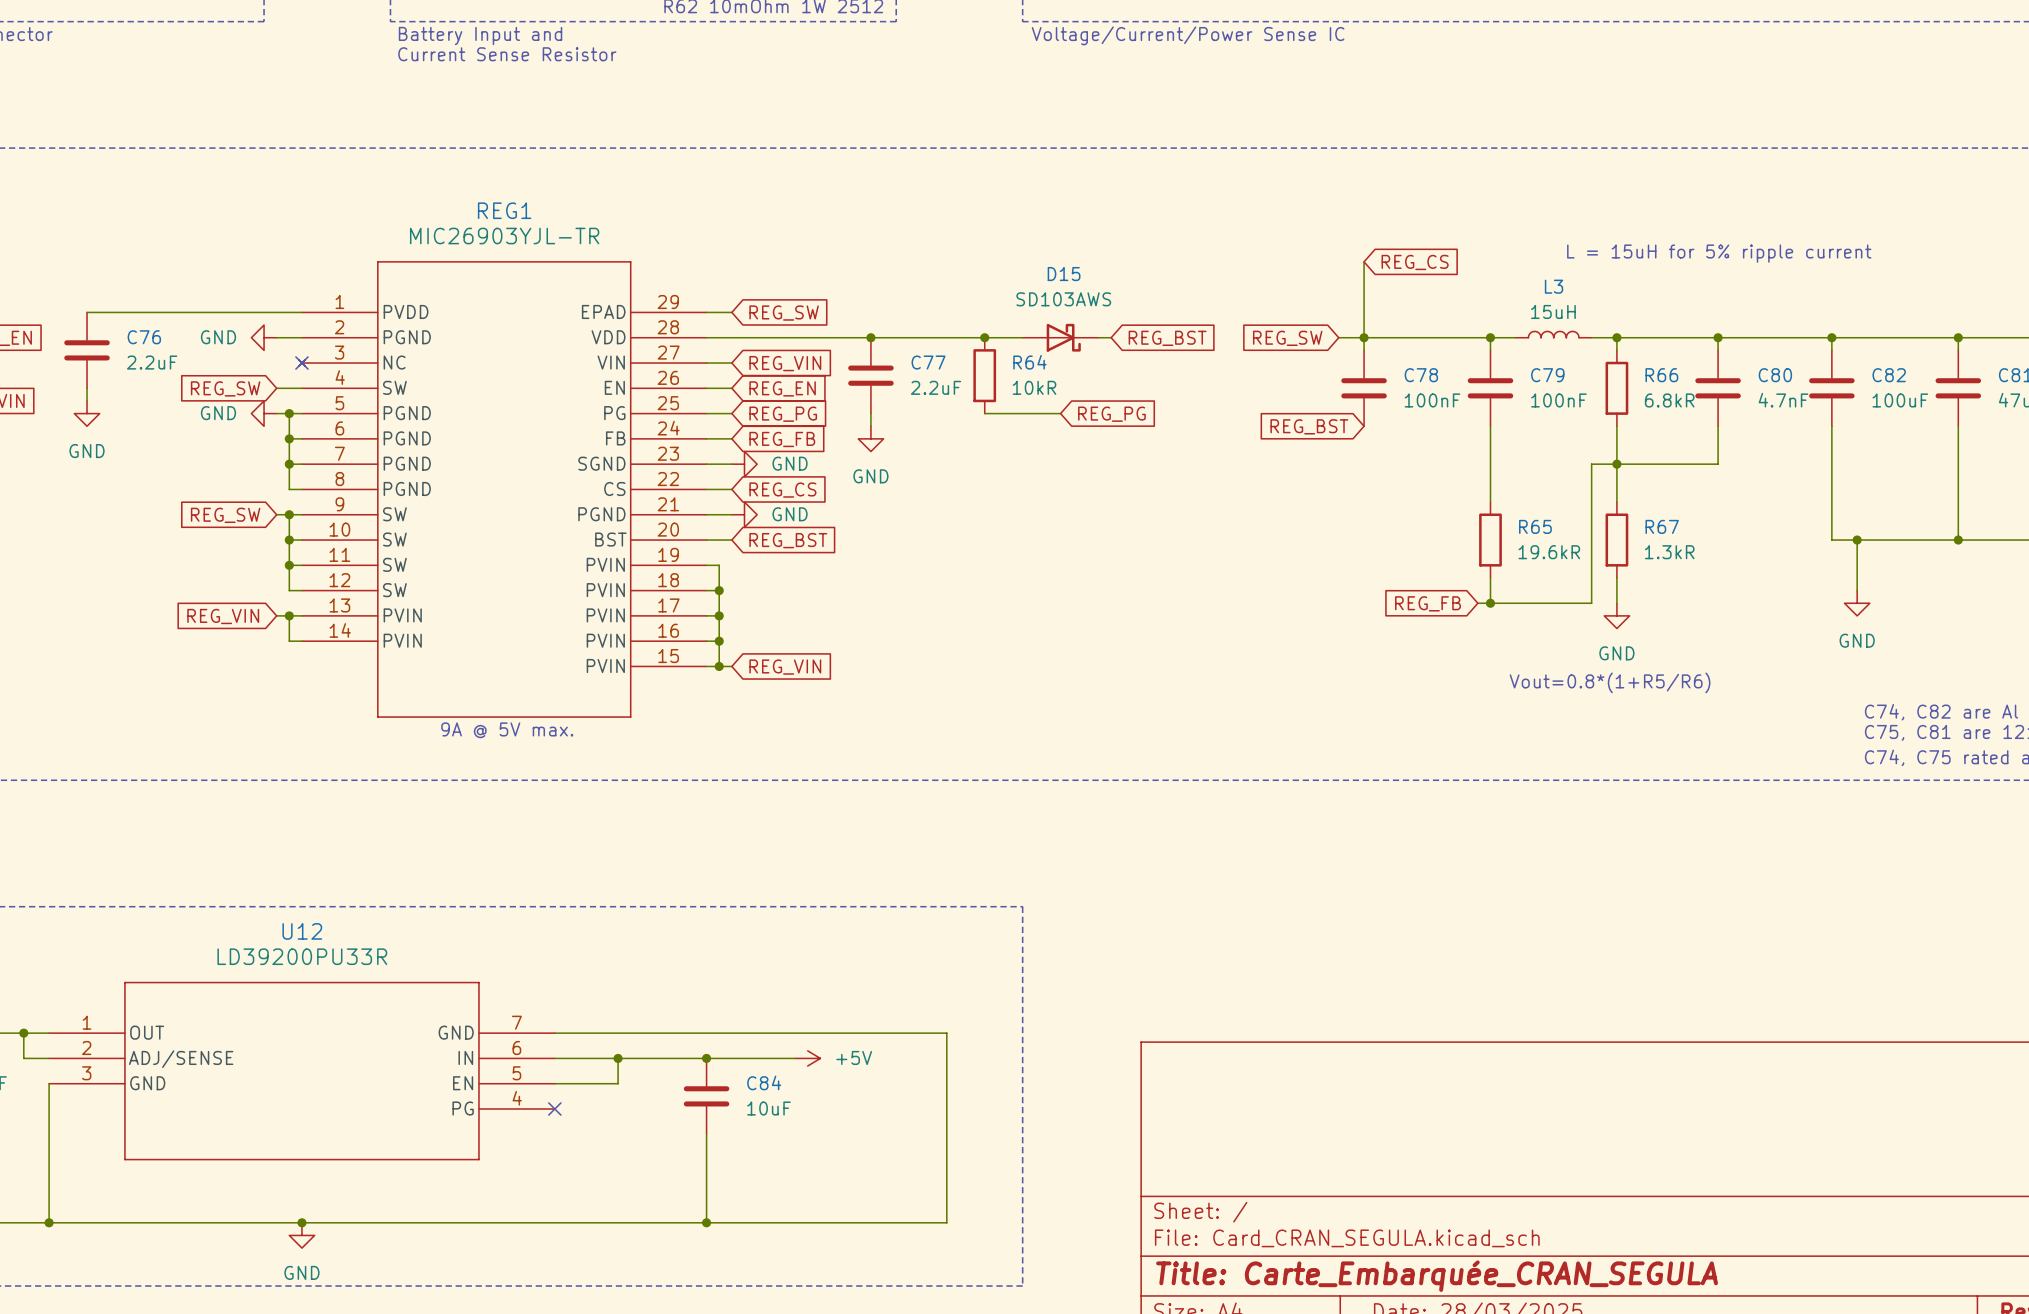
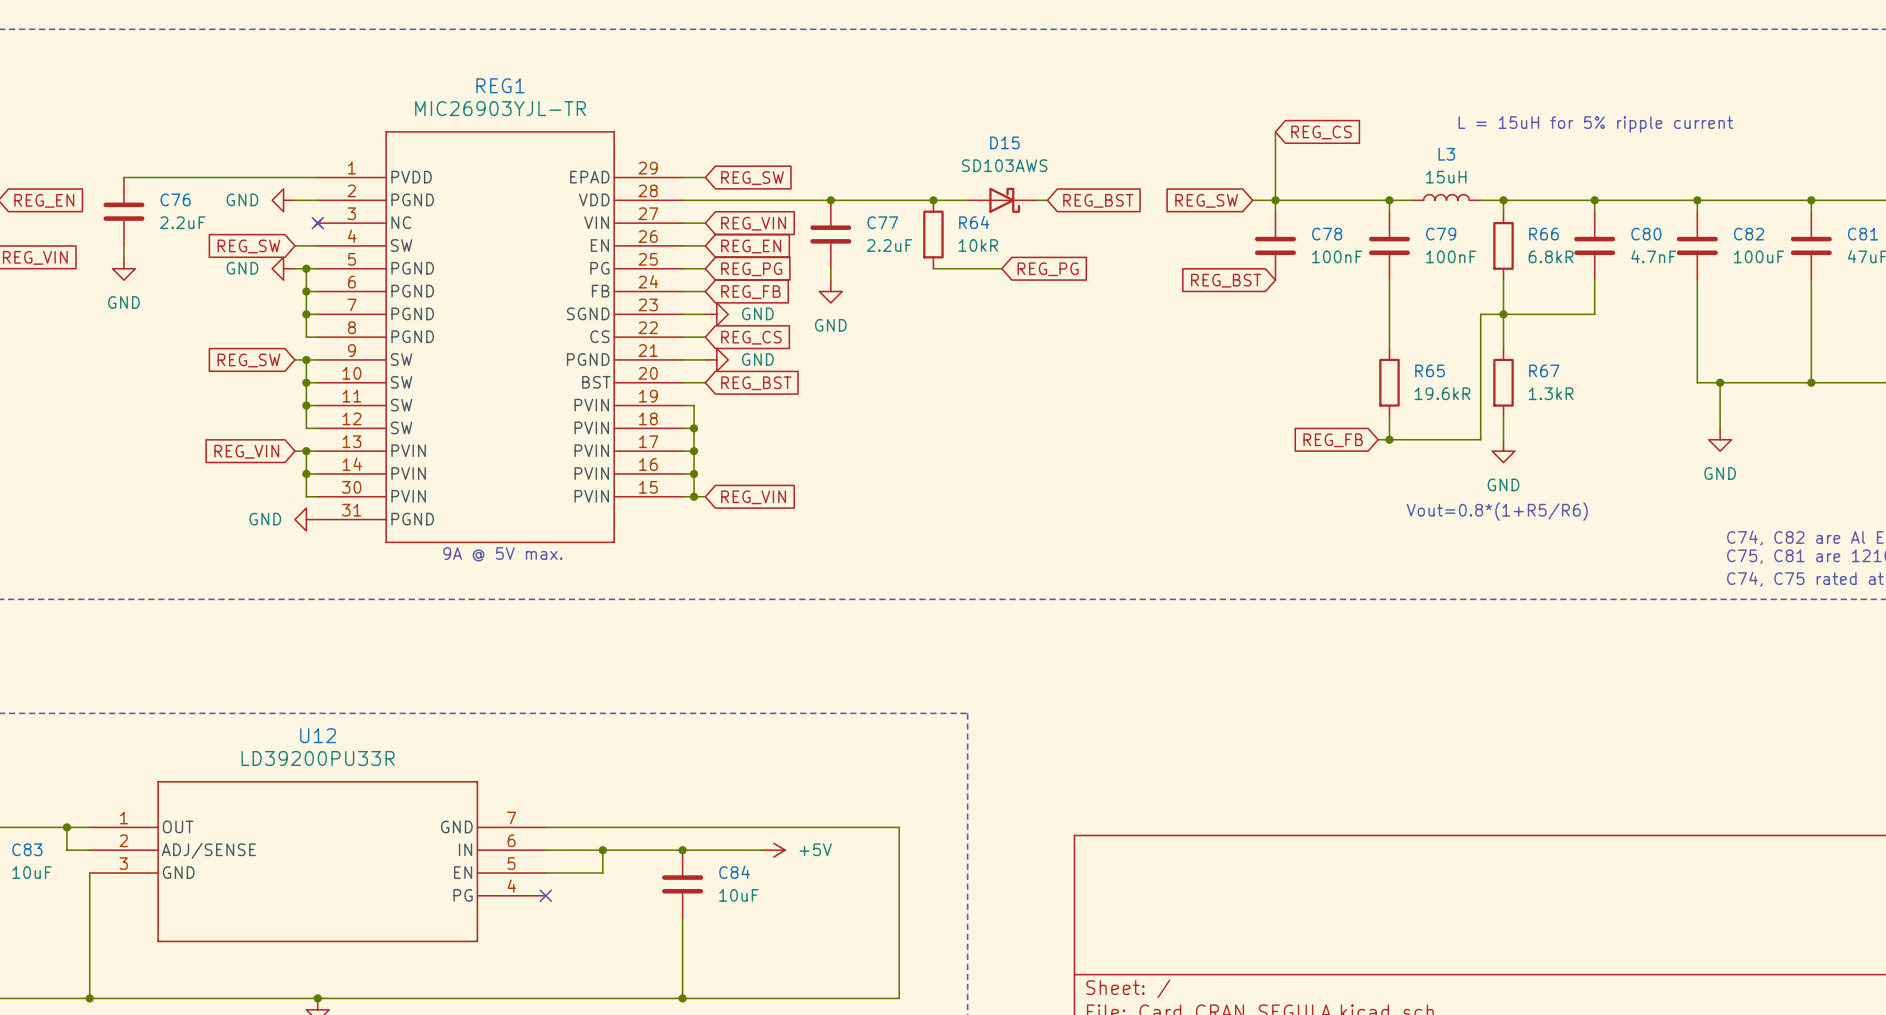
REG1 symbol: [298, 261, 707, 718] -> [315, 131, 683, 543]
wire: none -> (306, 473) (306, 496) (317, 496)
junction: none -> (306, 473)
power symbol: none -> GND (306, 519)

